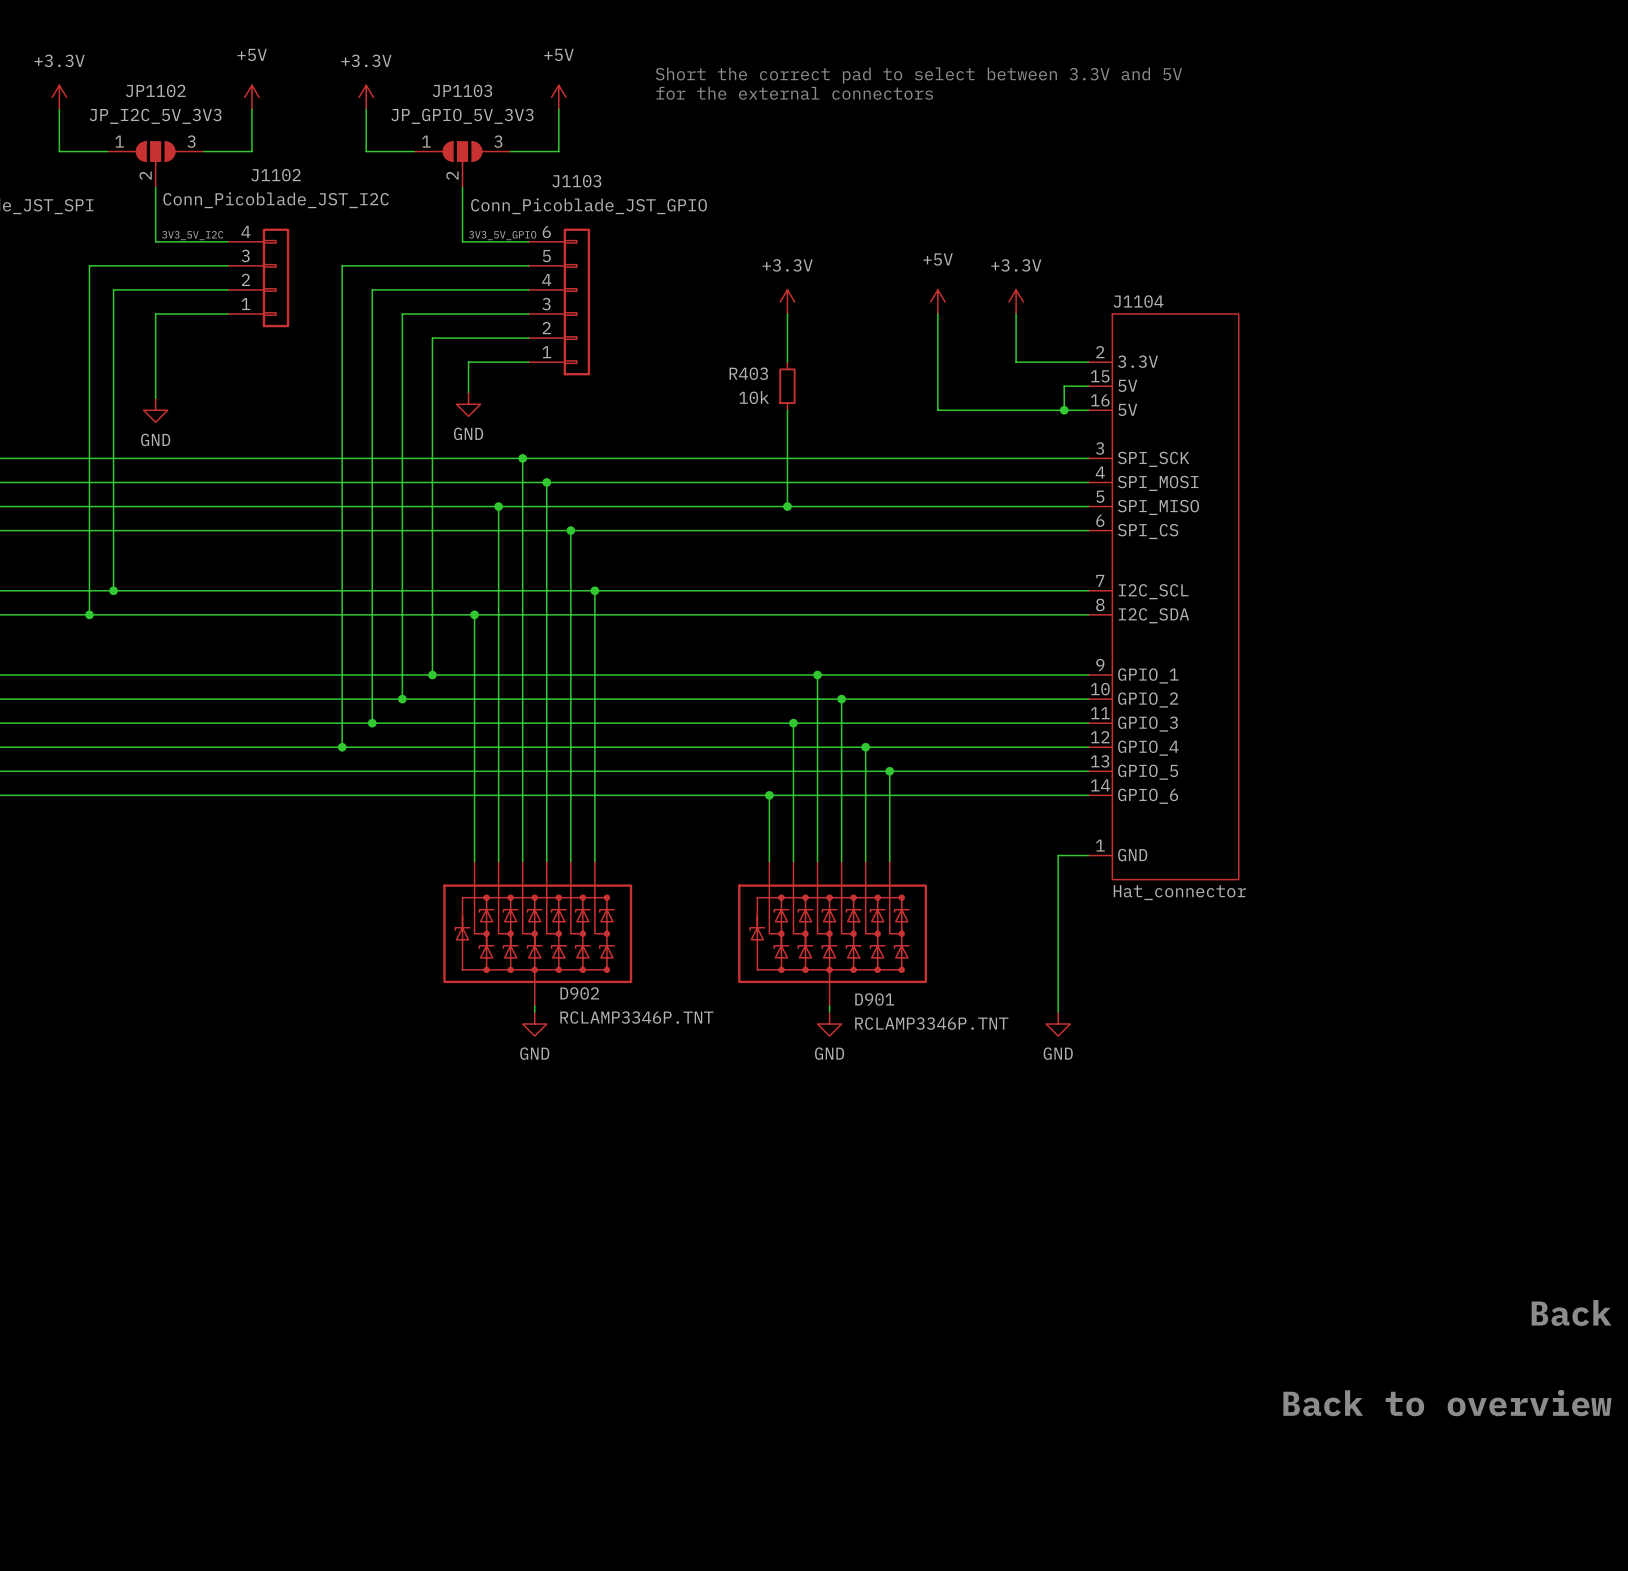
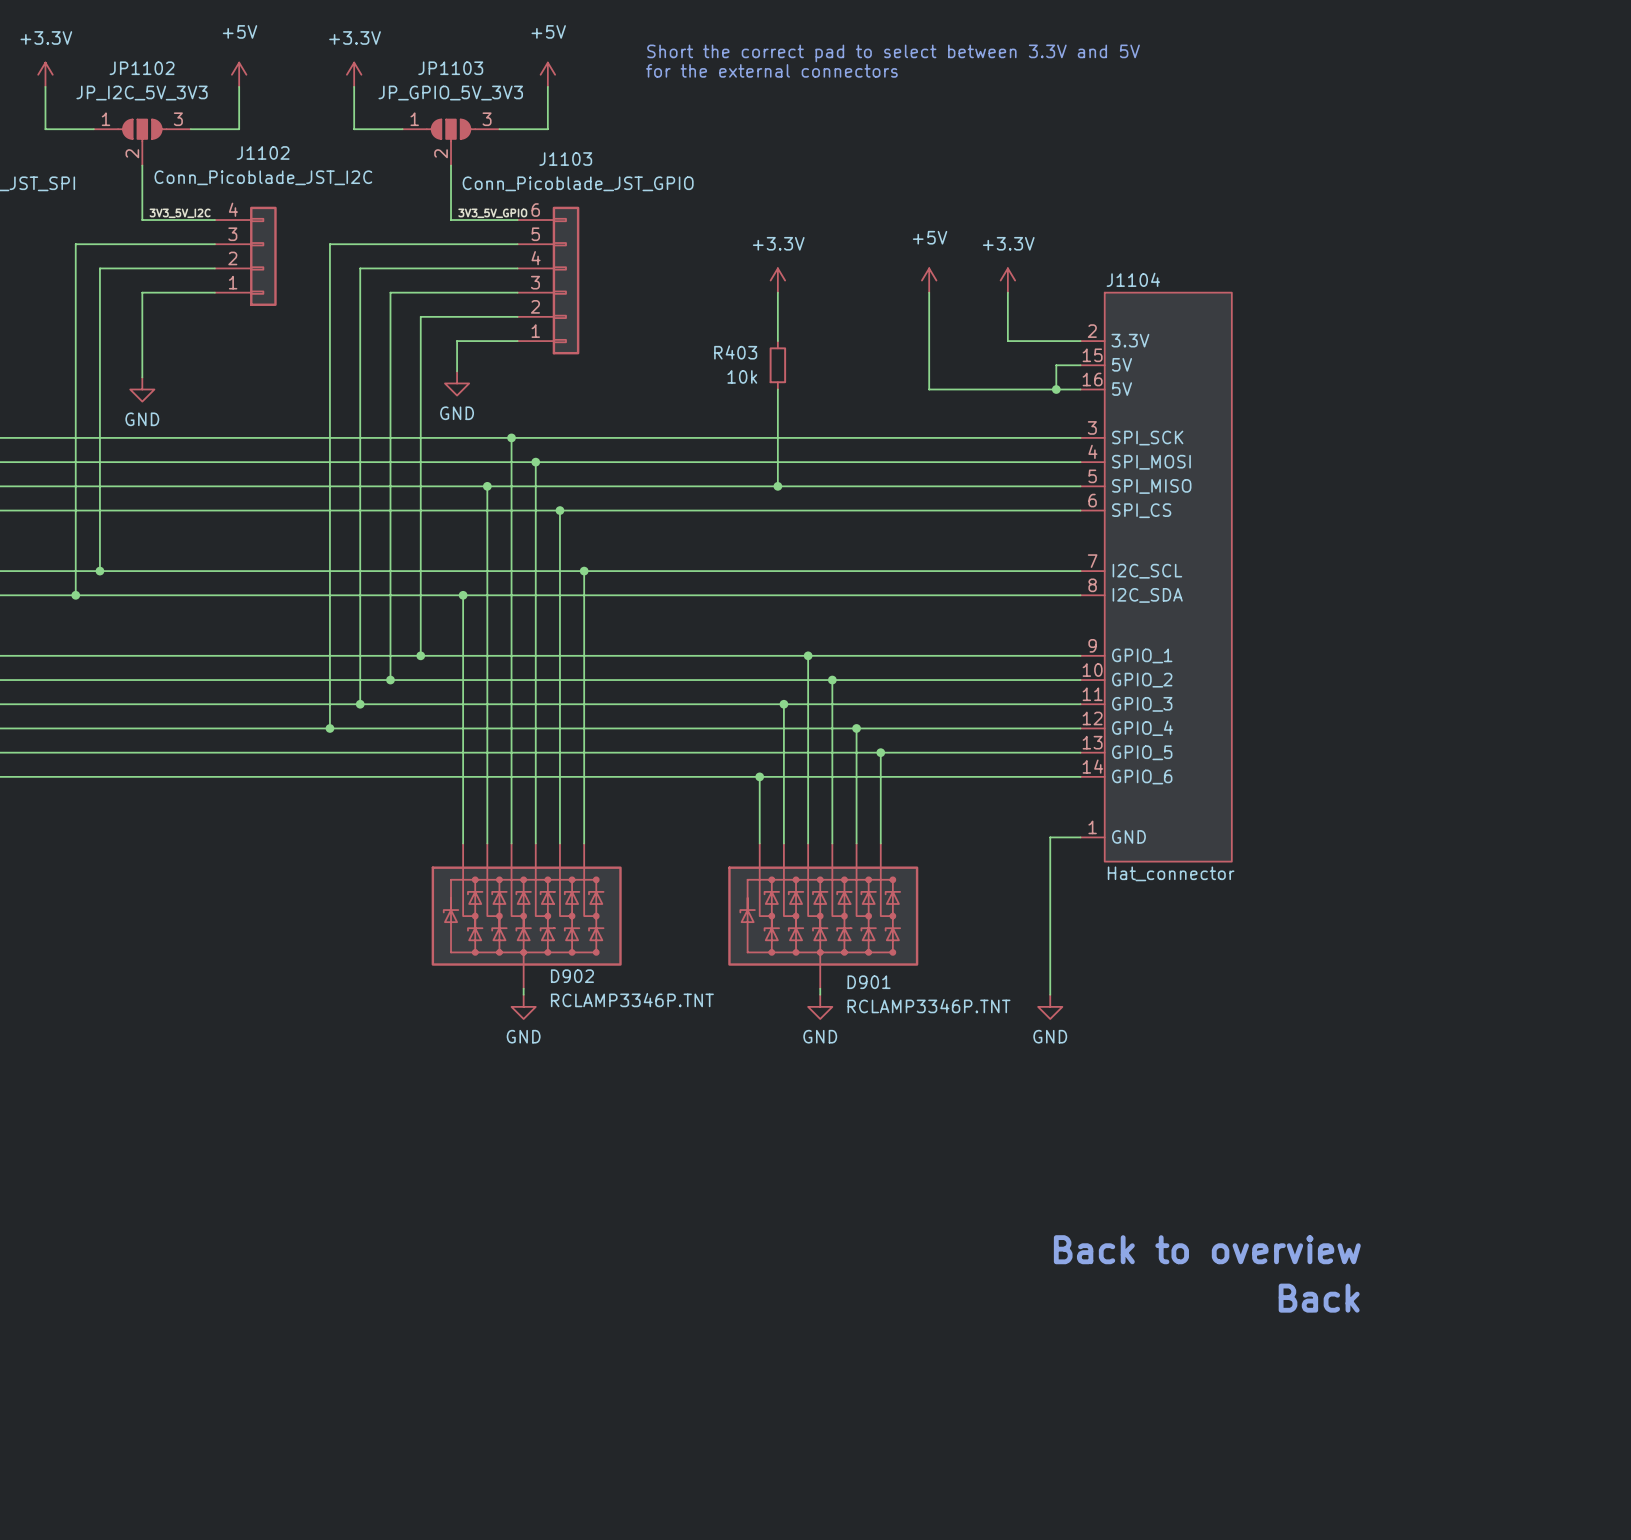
text: none -> Back to overview (1207, 1249)
text: none -> Back (1319, 1298)
text: Back (1571, 1313) -> none
text: Back to overview (1447, 1403) -> none

